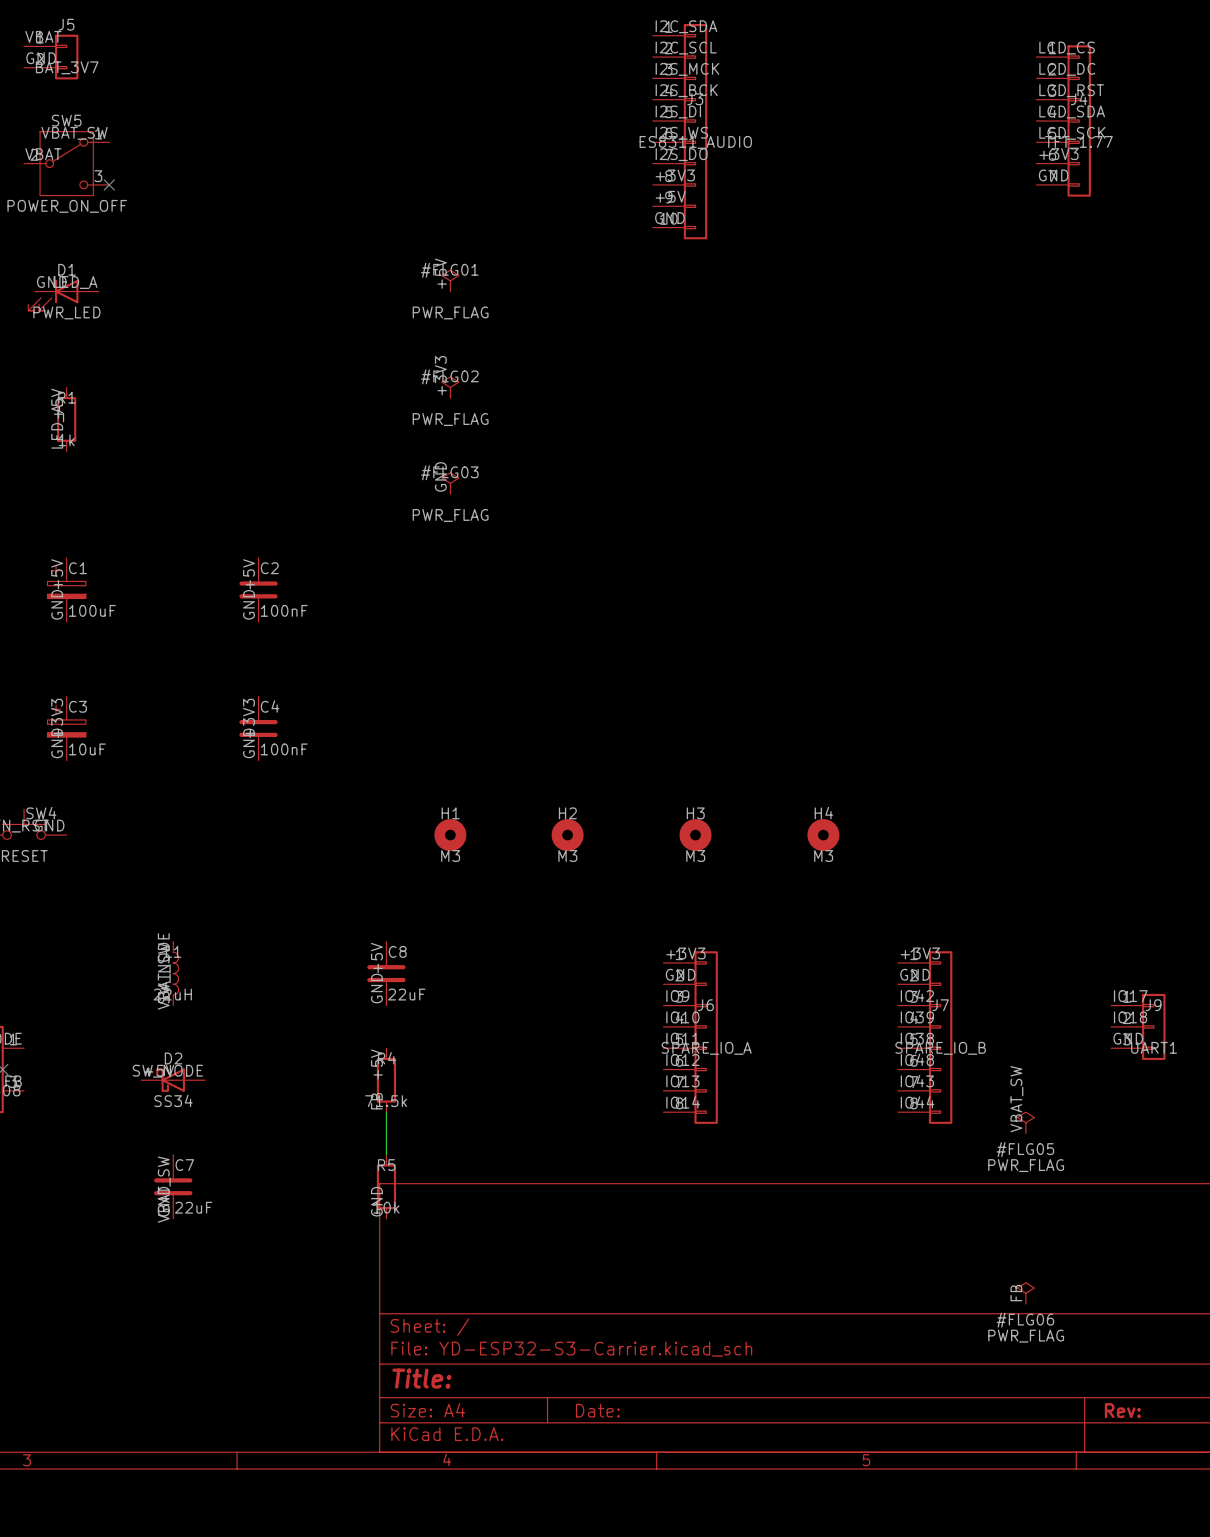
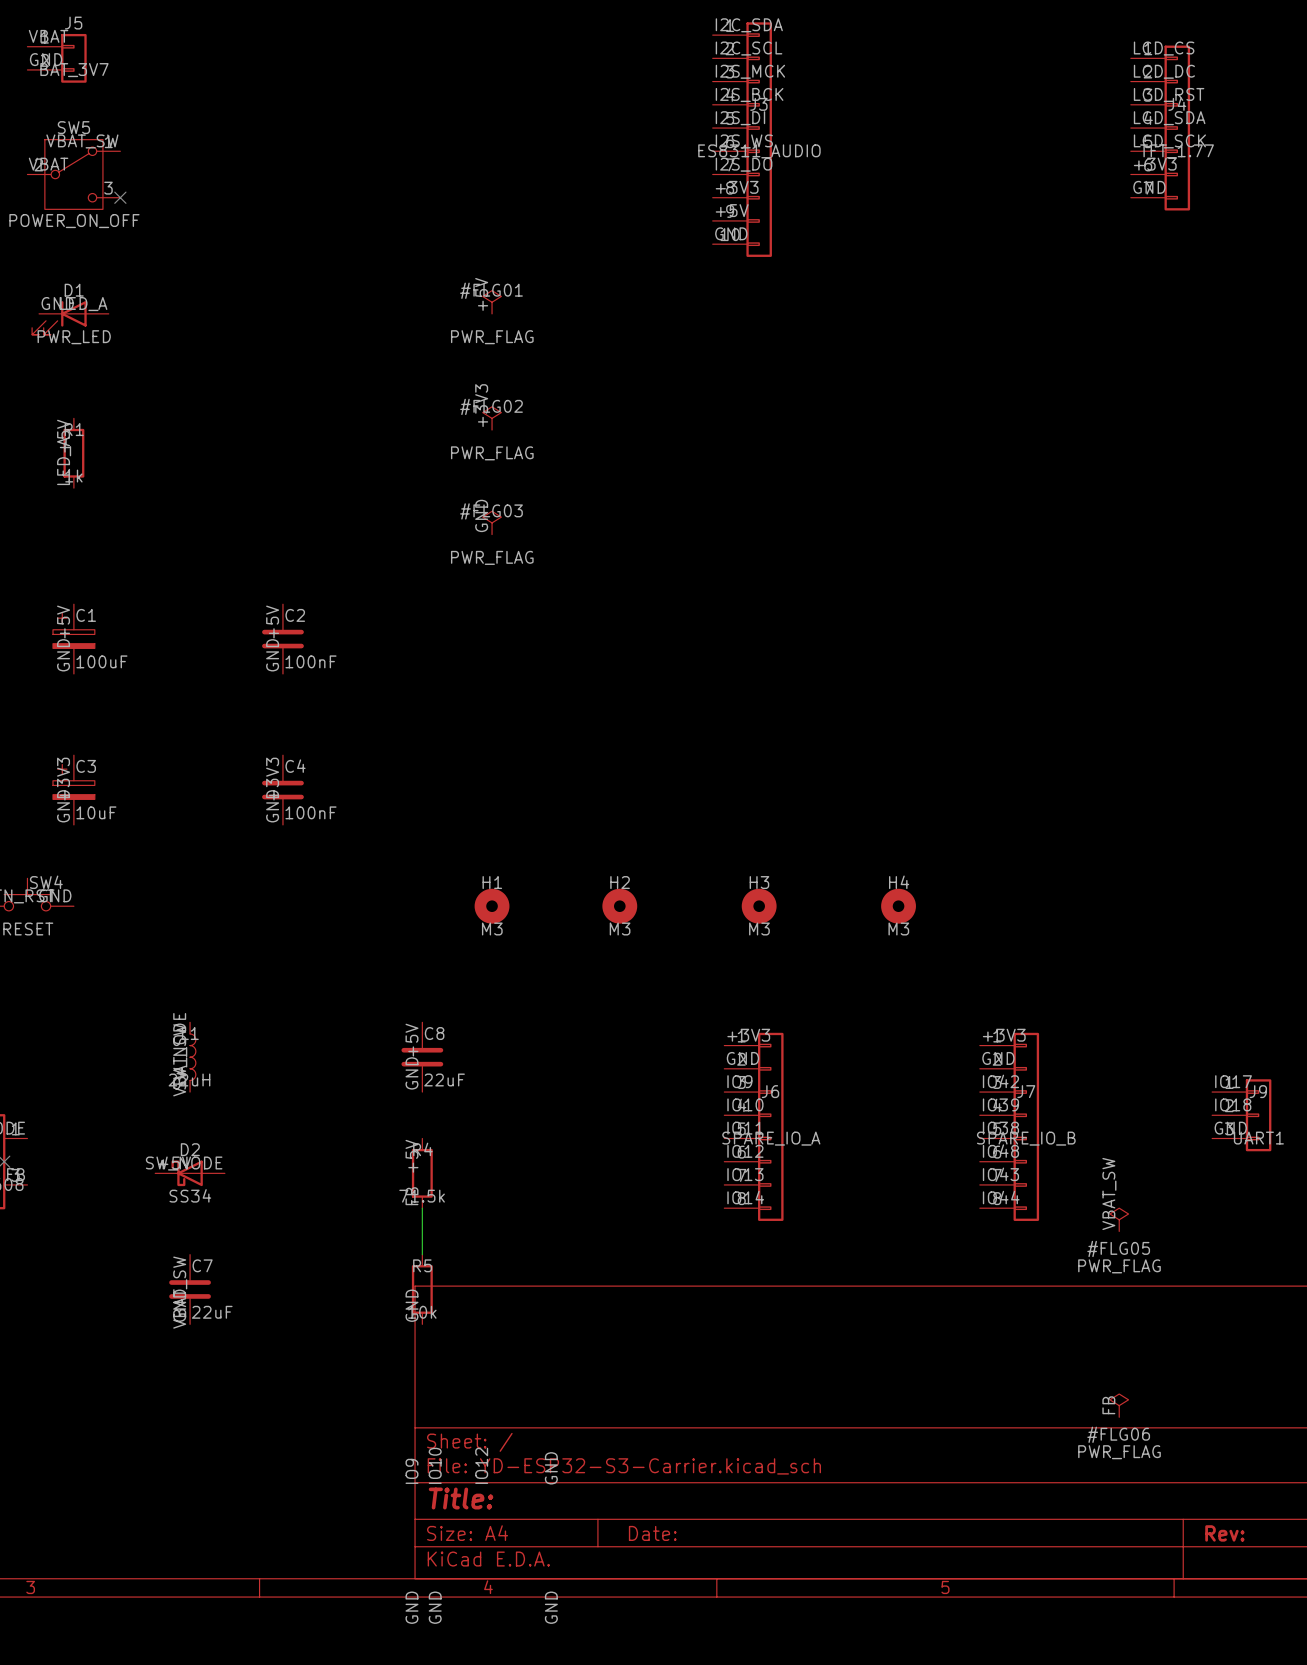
label: none -> IO10 (435, 1465)
label: none -> IO12 (481, 1465)
label: none -> GND (551, 1468)
label: none -> IO9 (411, 1471)
label: none -> GND (411, 1607)
label: none -> GND (435, 1607)
label: none -> GND (551, 1607)

